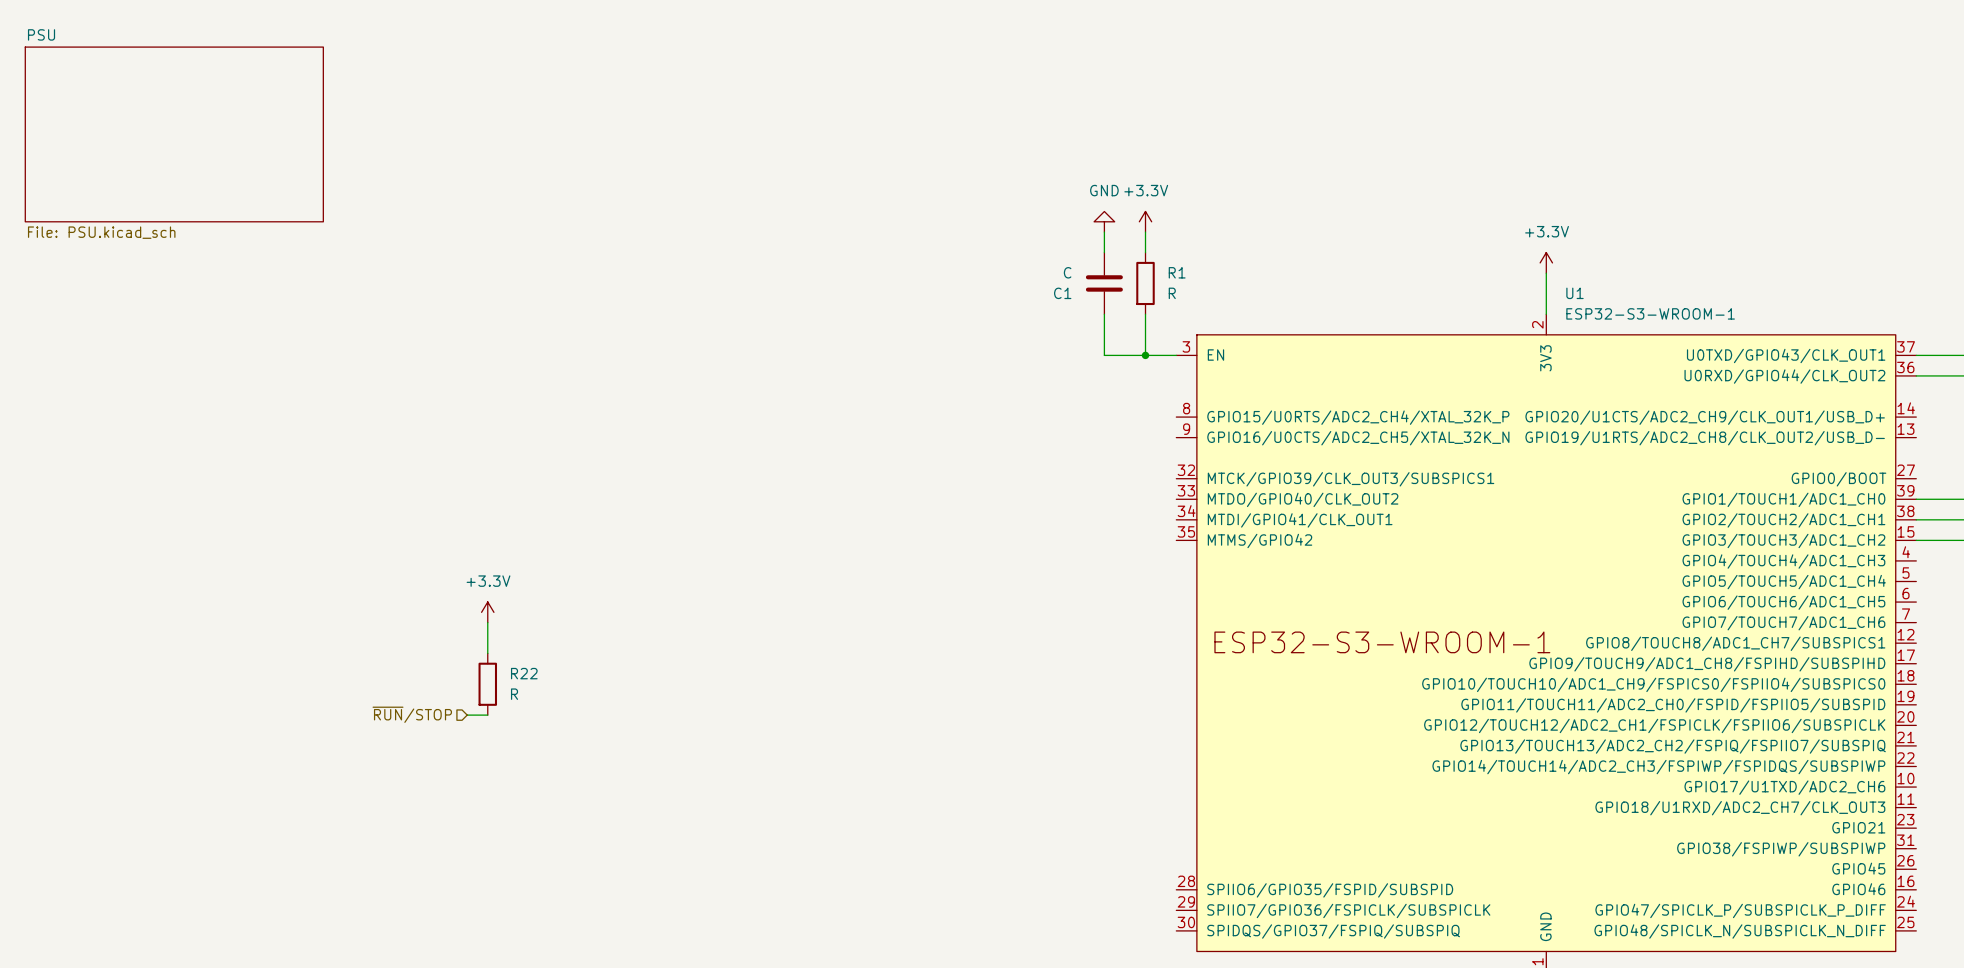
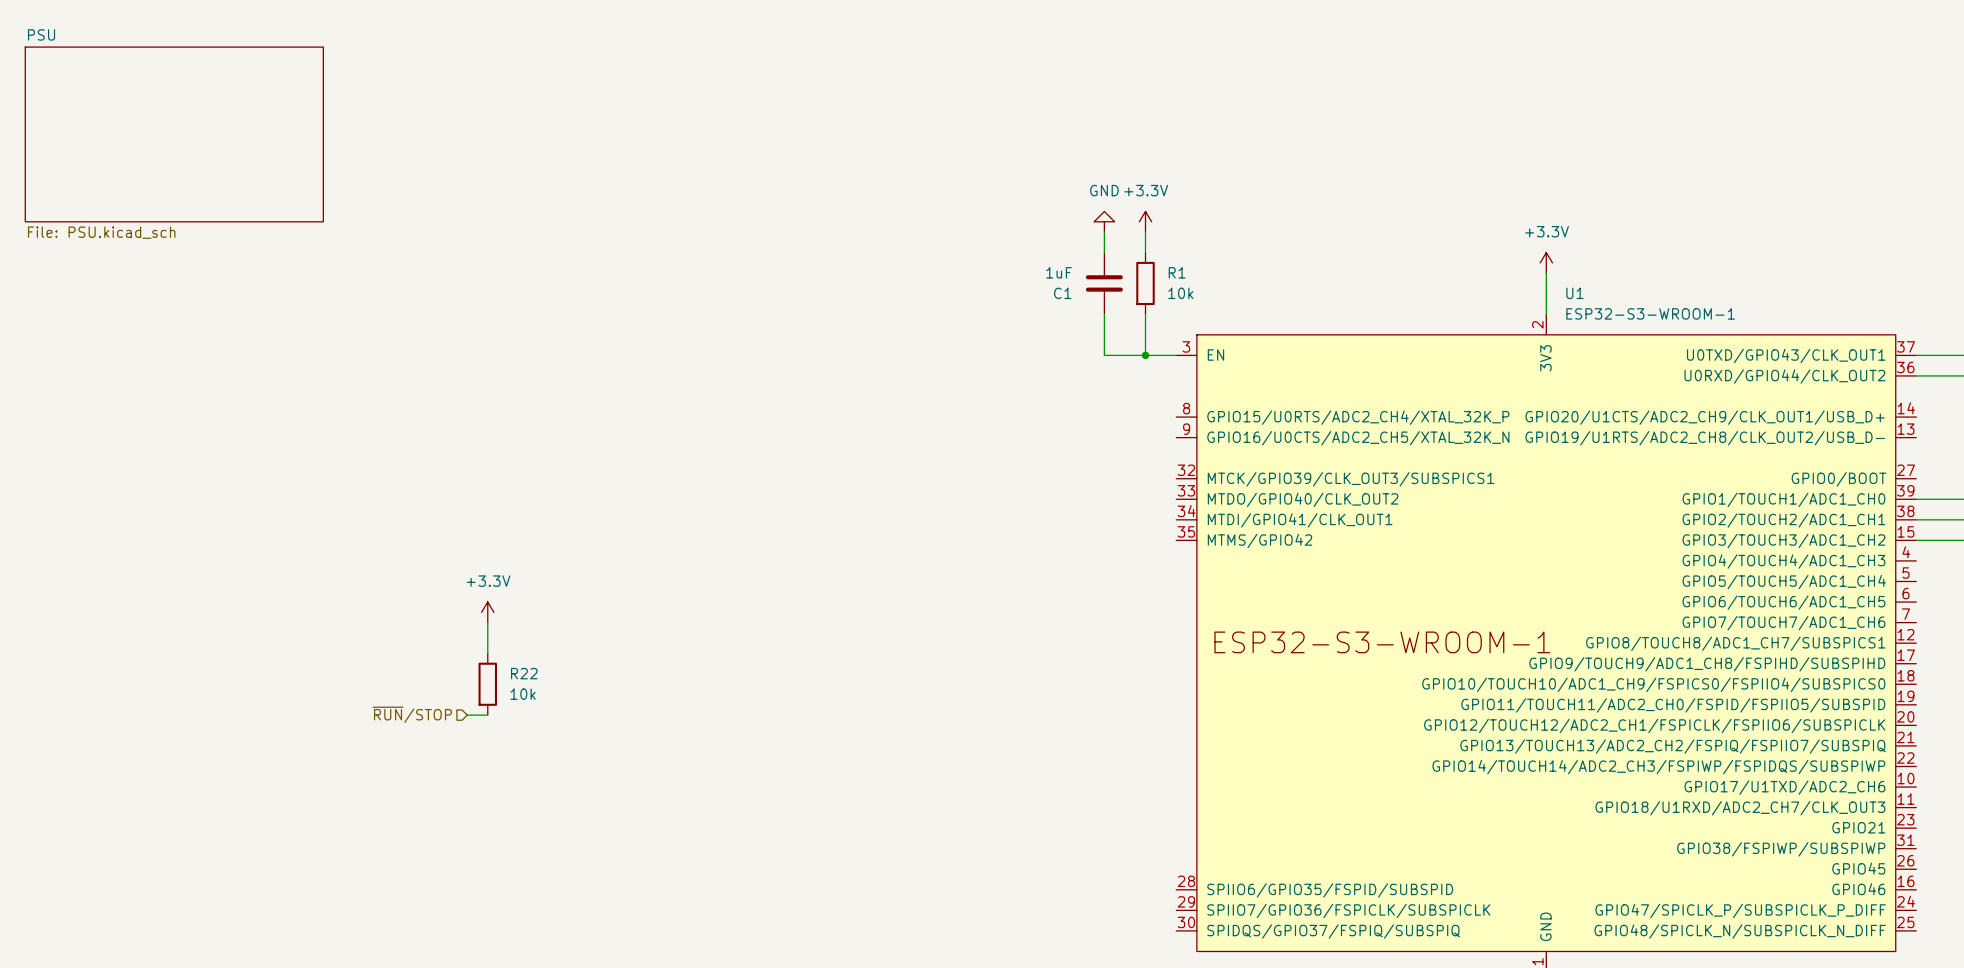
C1 value: C (1067, 272) -> 1uF (1059, 272)
R1 value: R (1172, 293) -> 10k (1180, 293)
R22 value: R (514, 694) -> 10k (523, 694)

